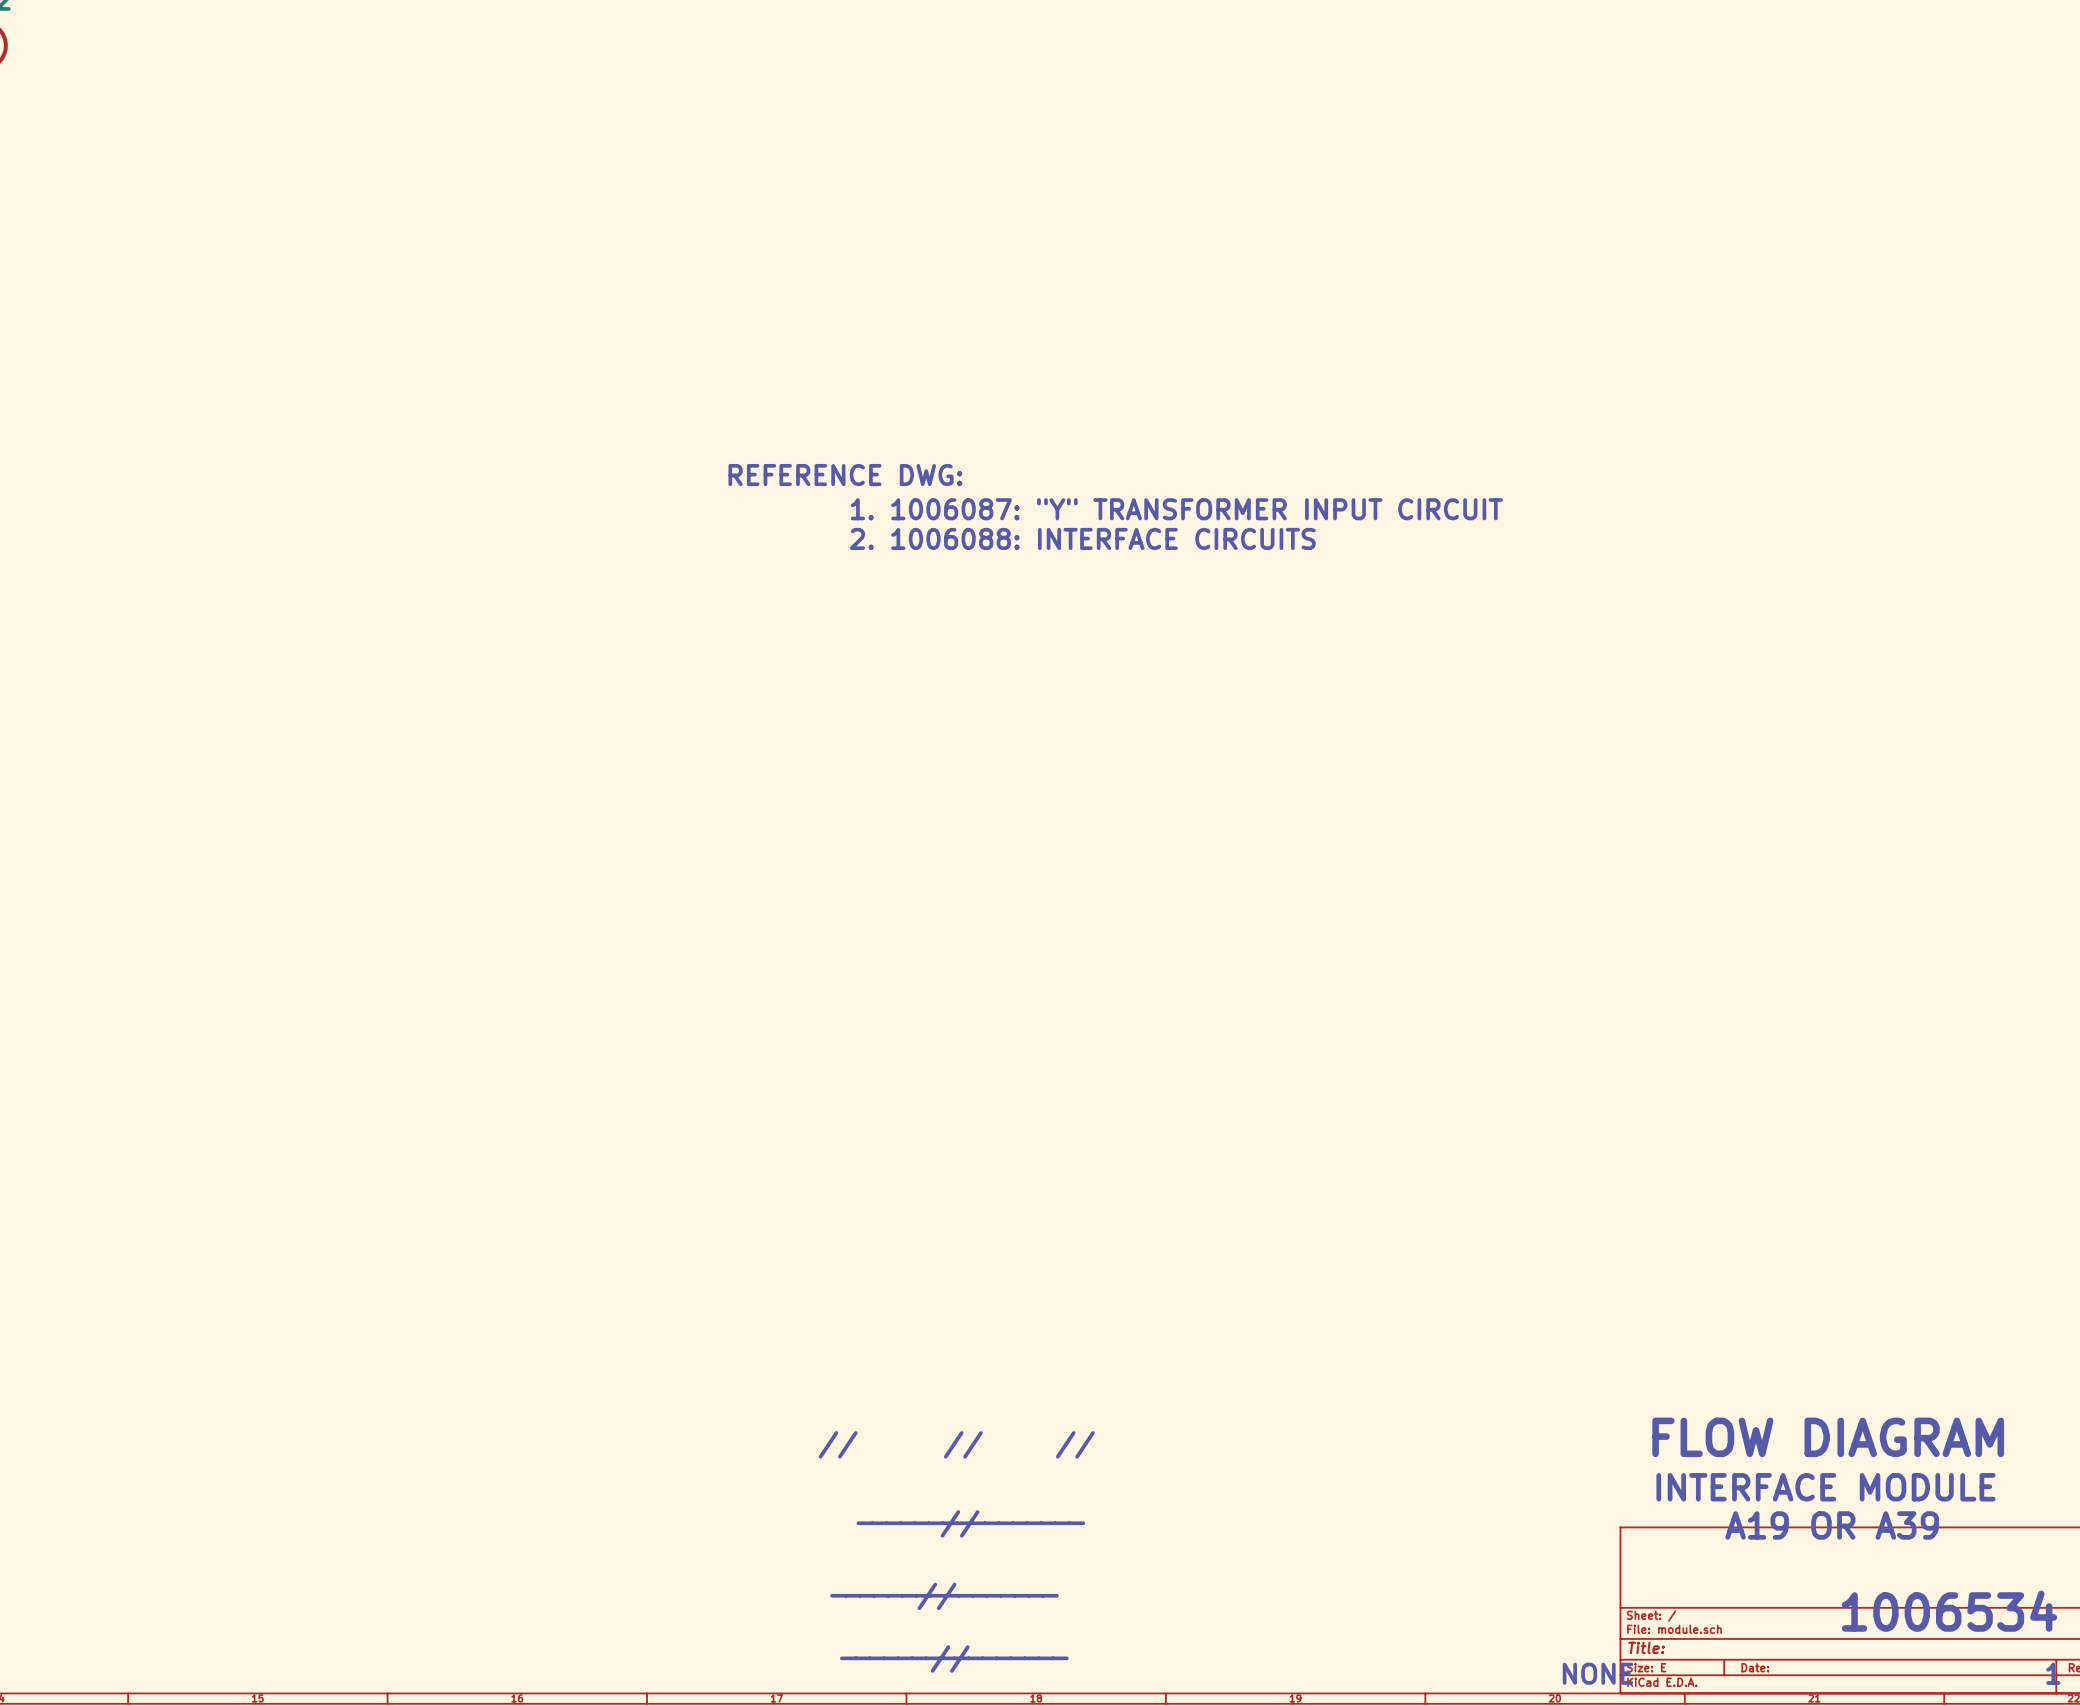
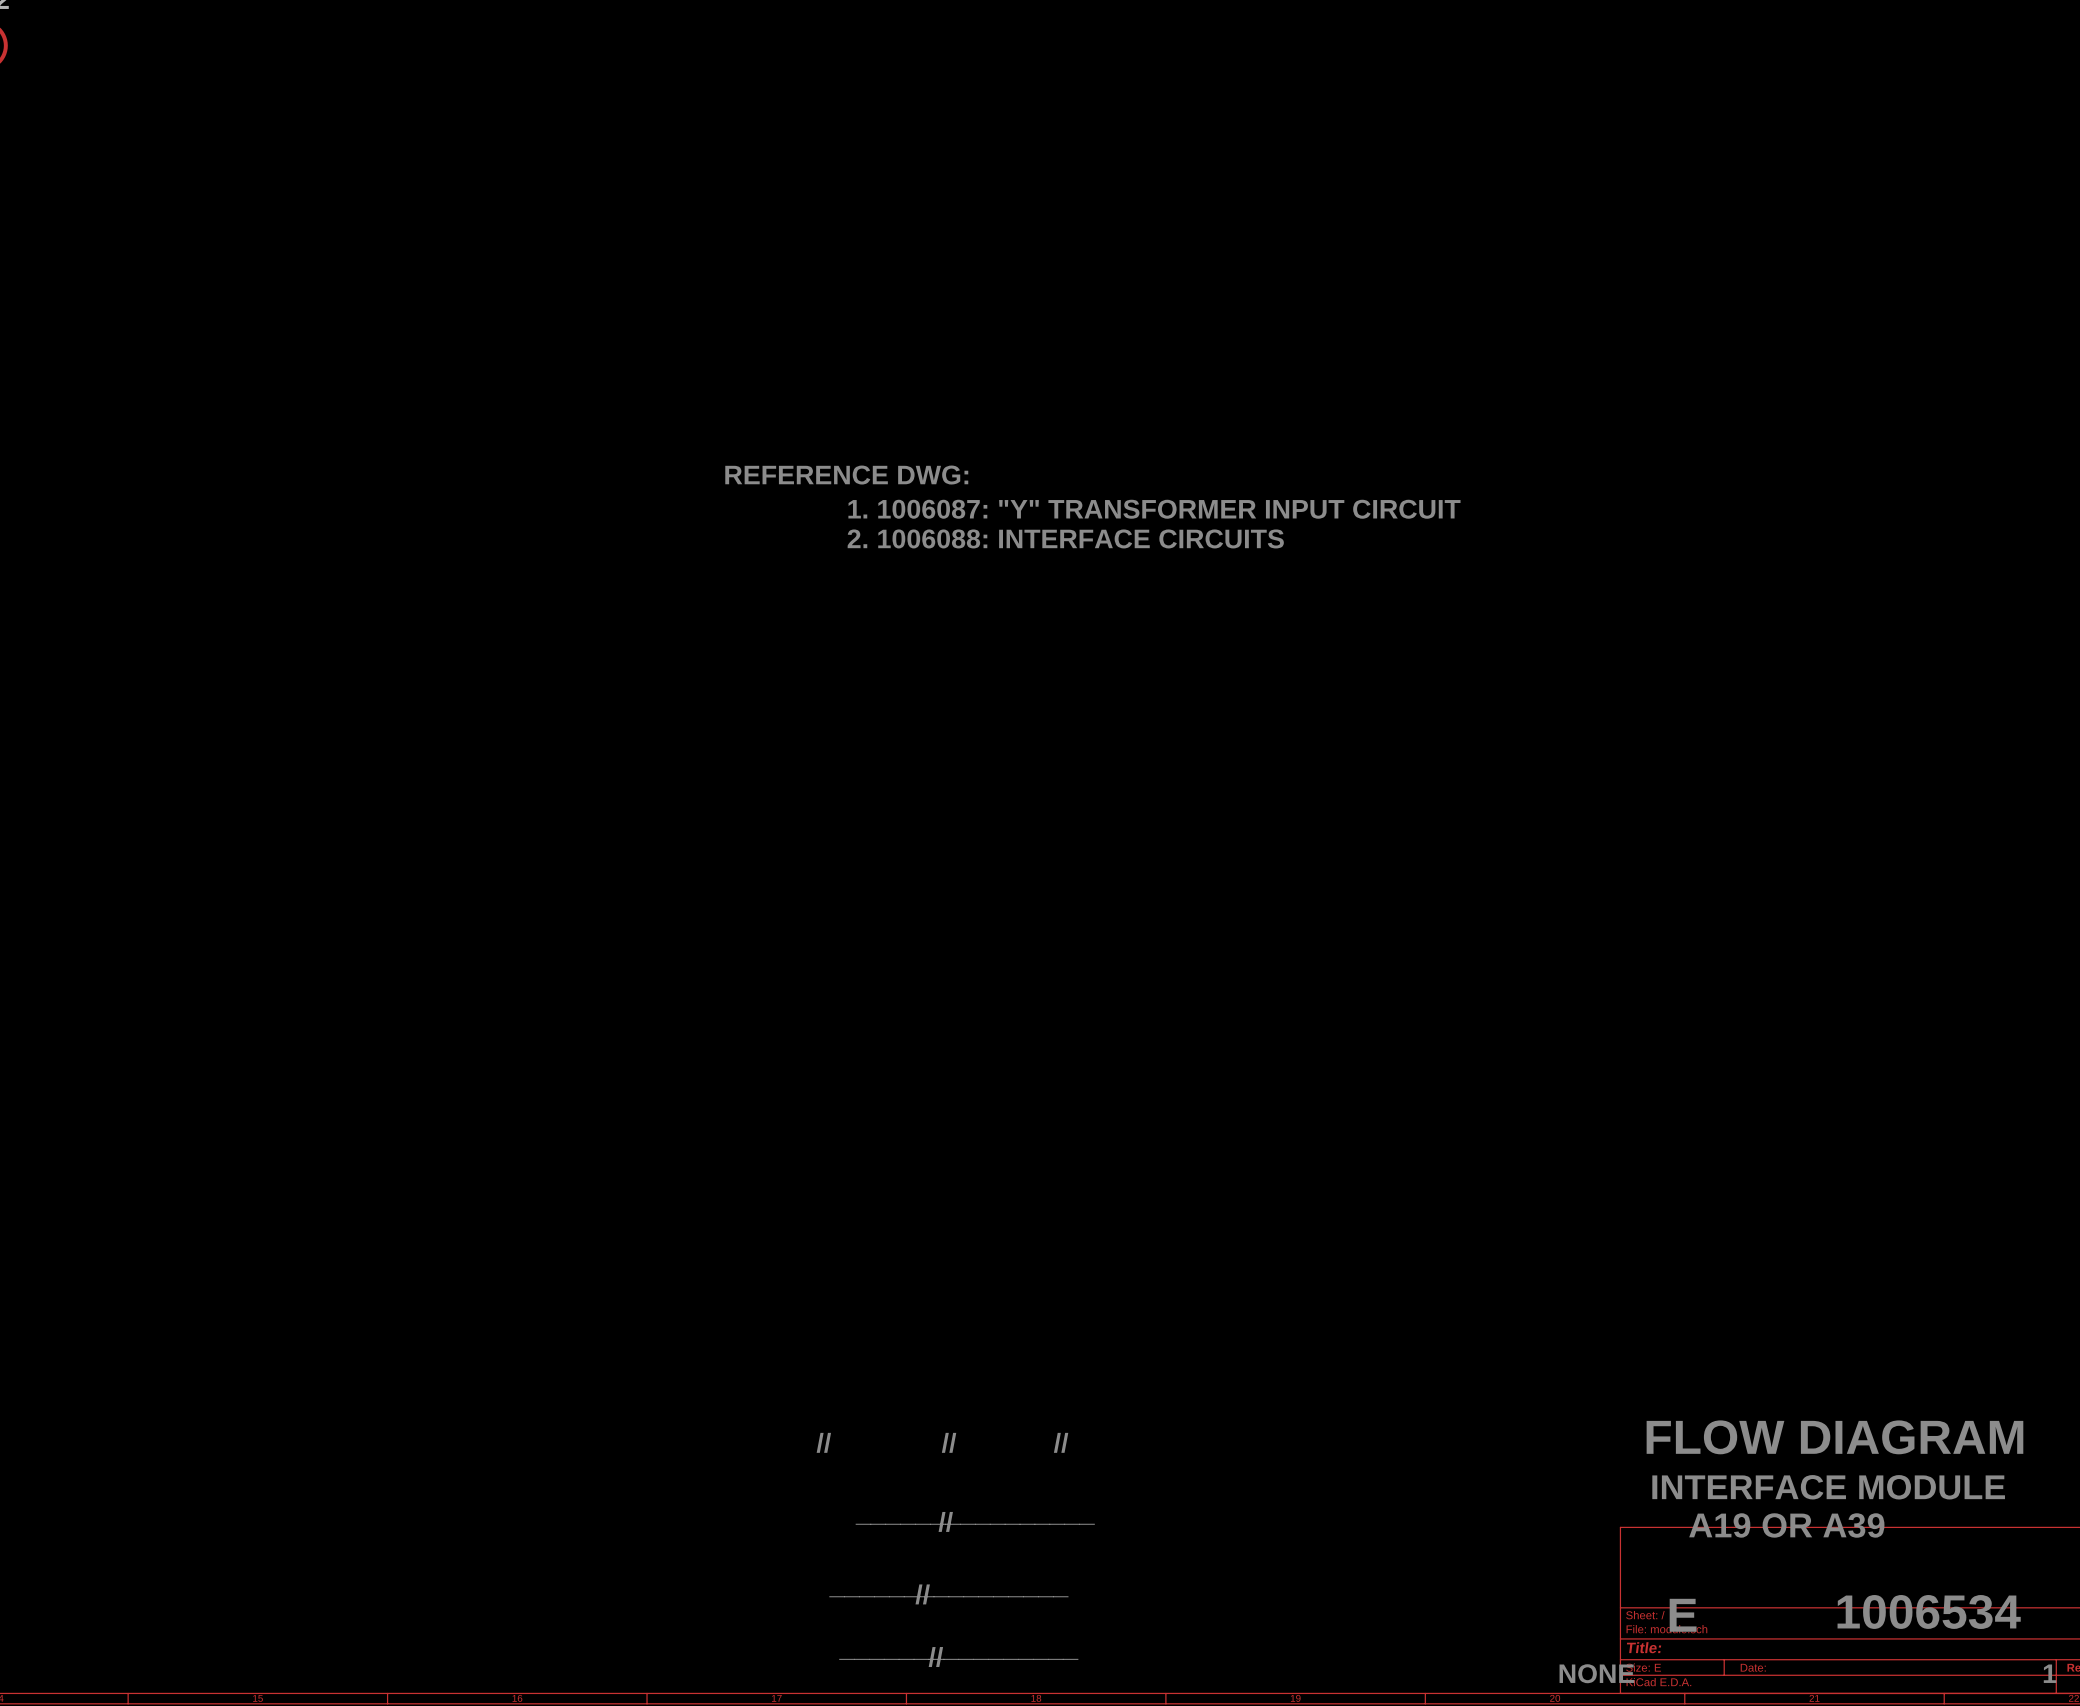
text: none -> E (1683, 1615)

